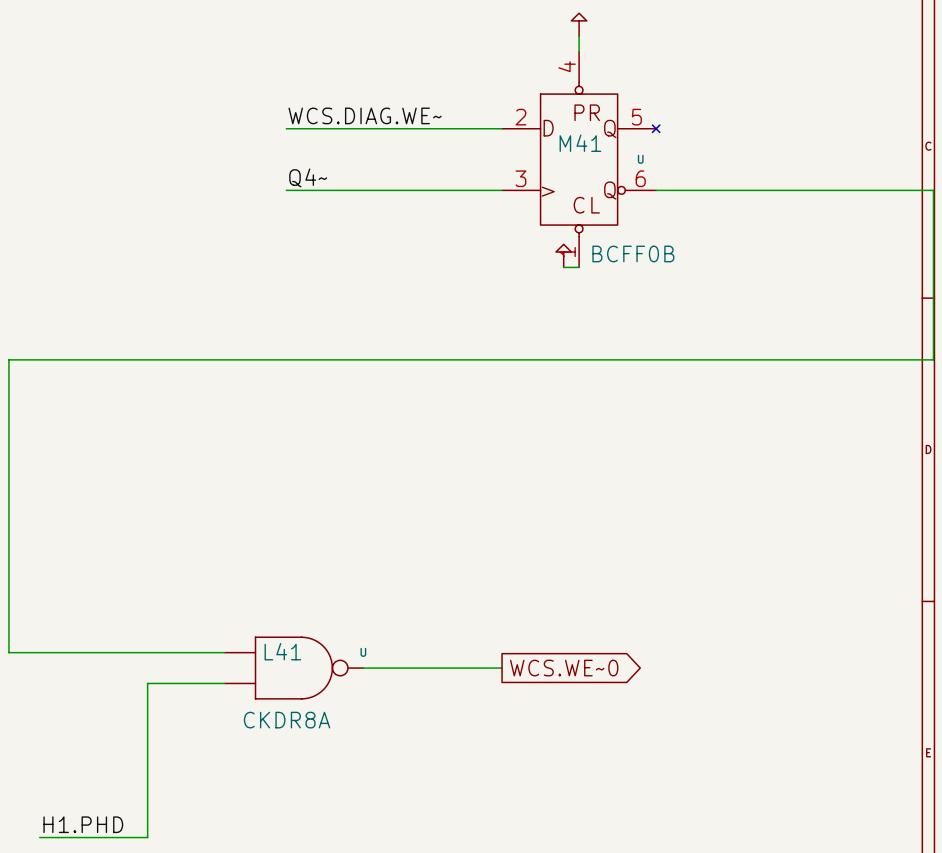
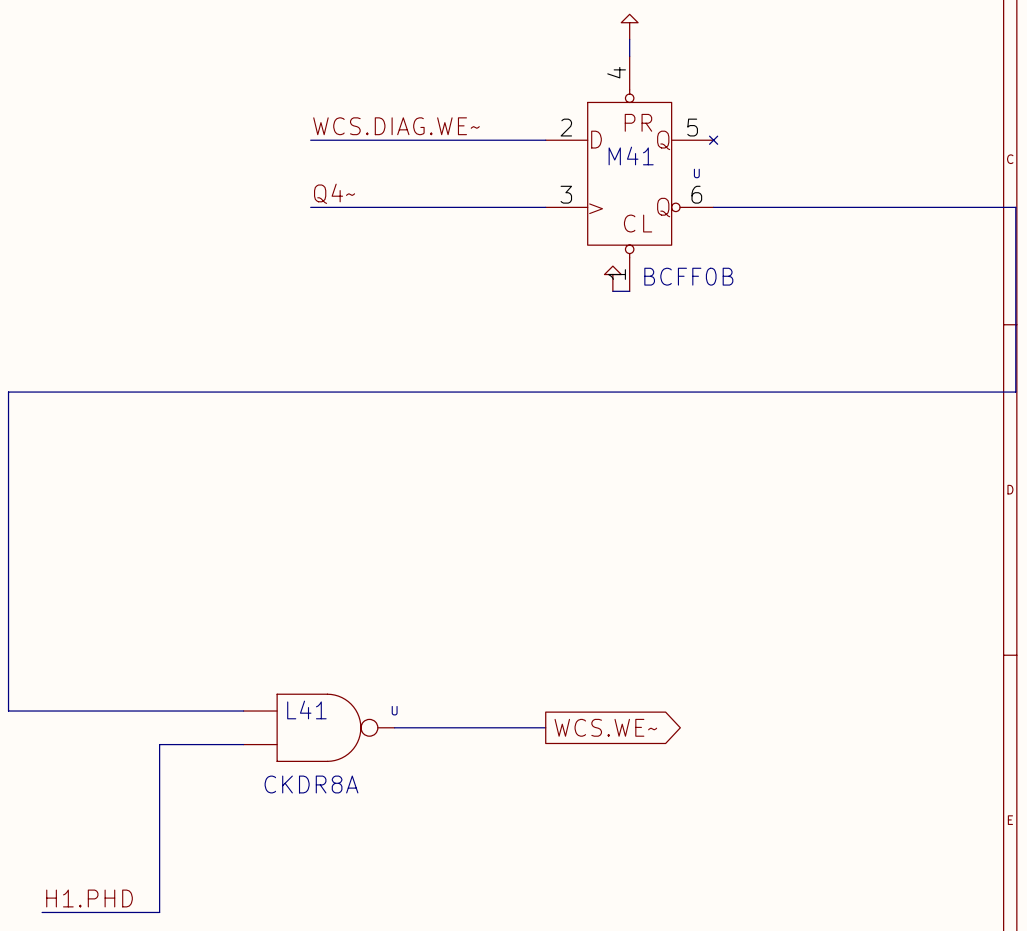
global label: WCS.WE~0 (564, 668) -> WCS.WE~ (605, 727)

